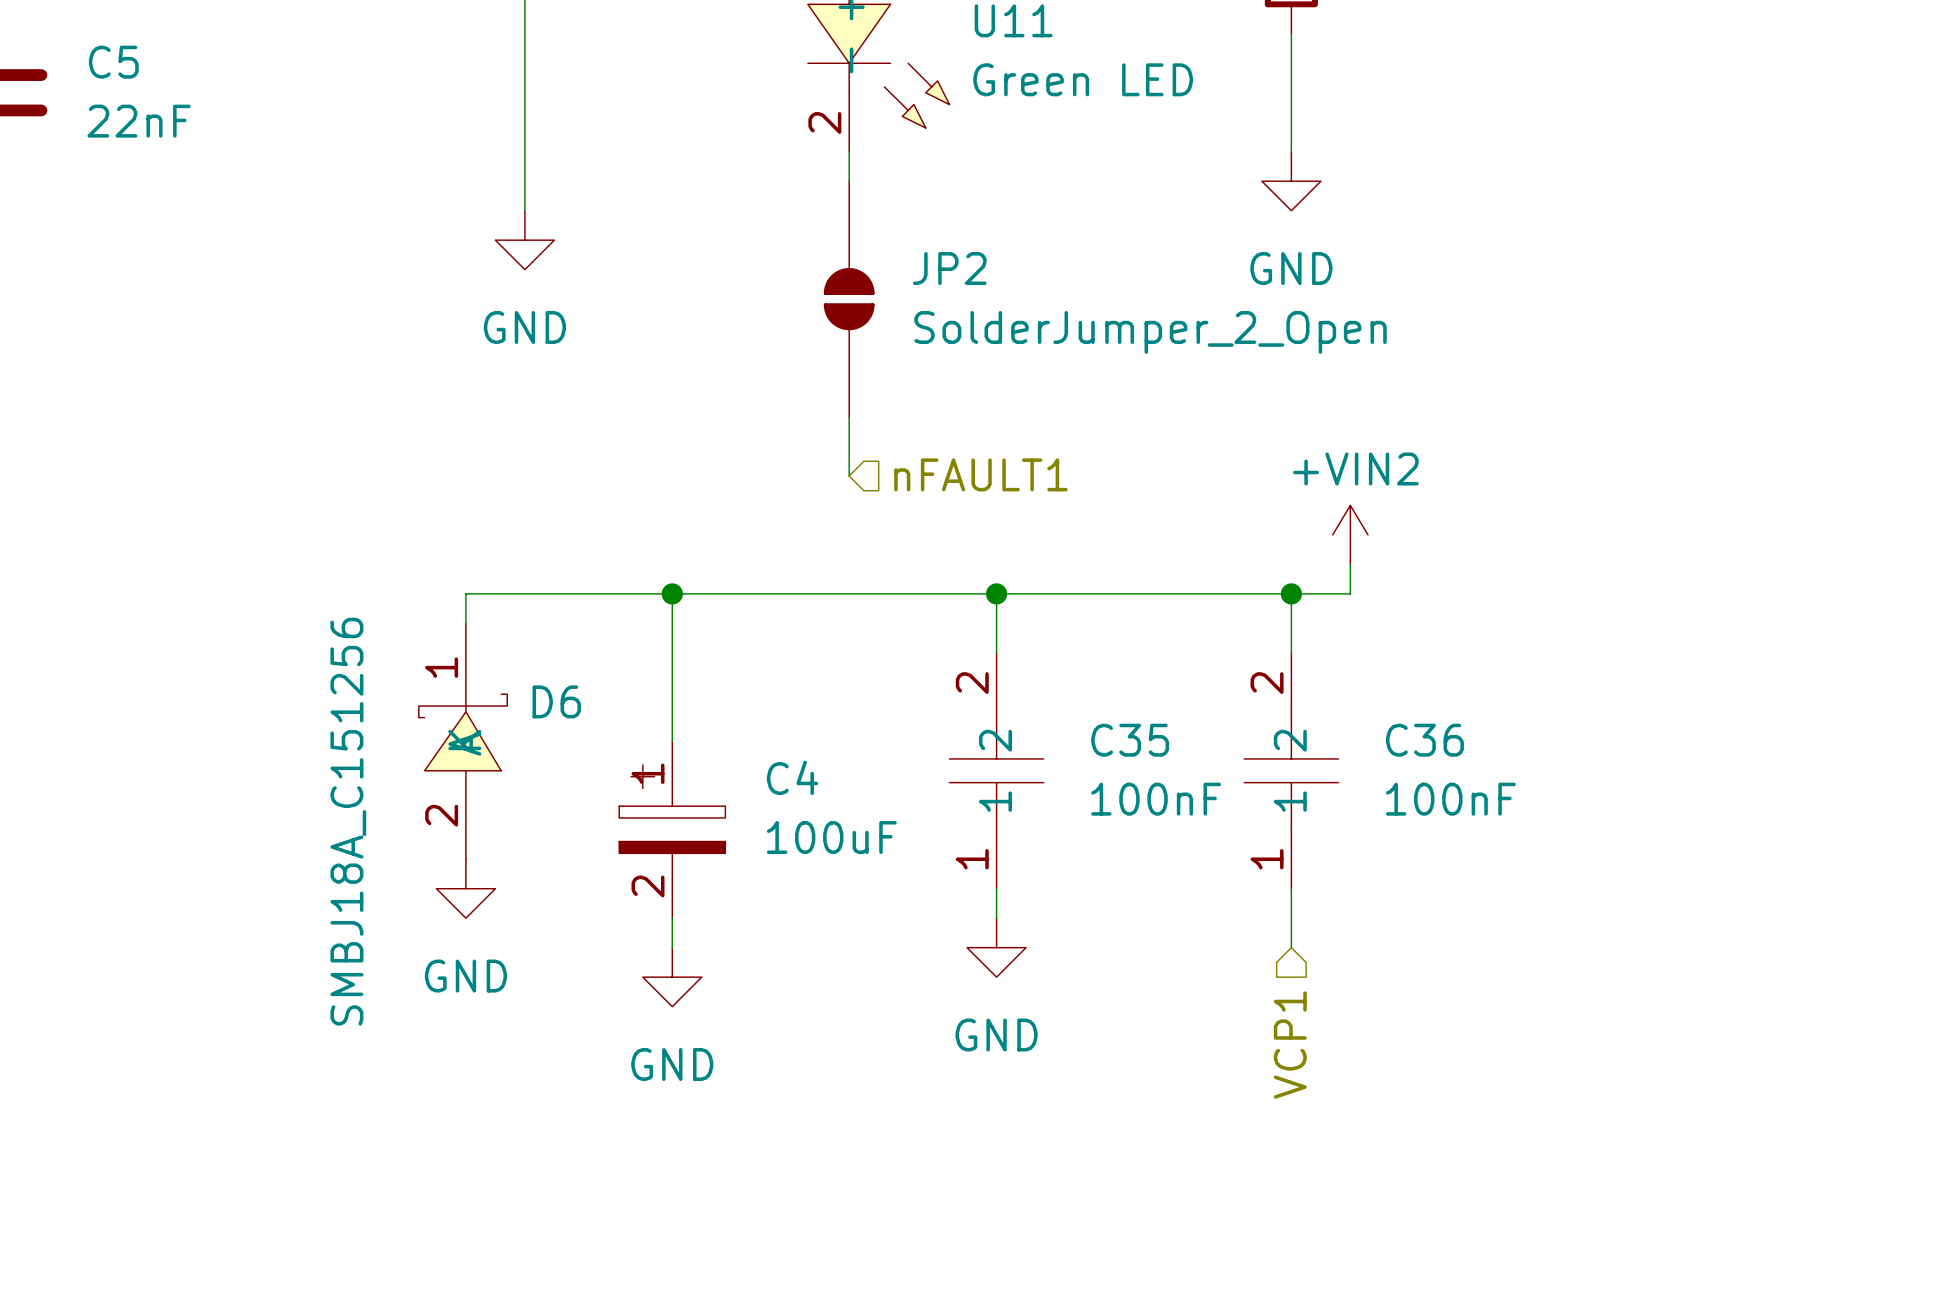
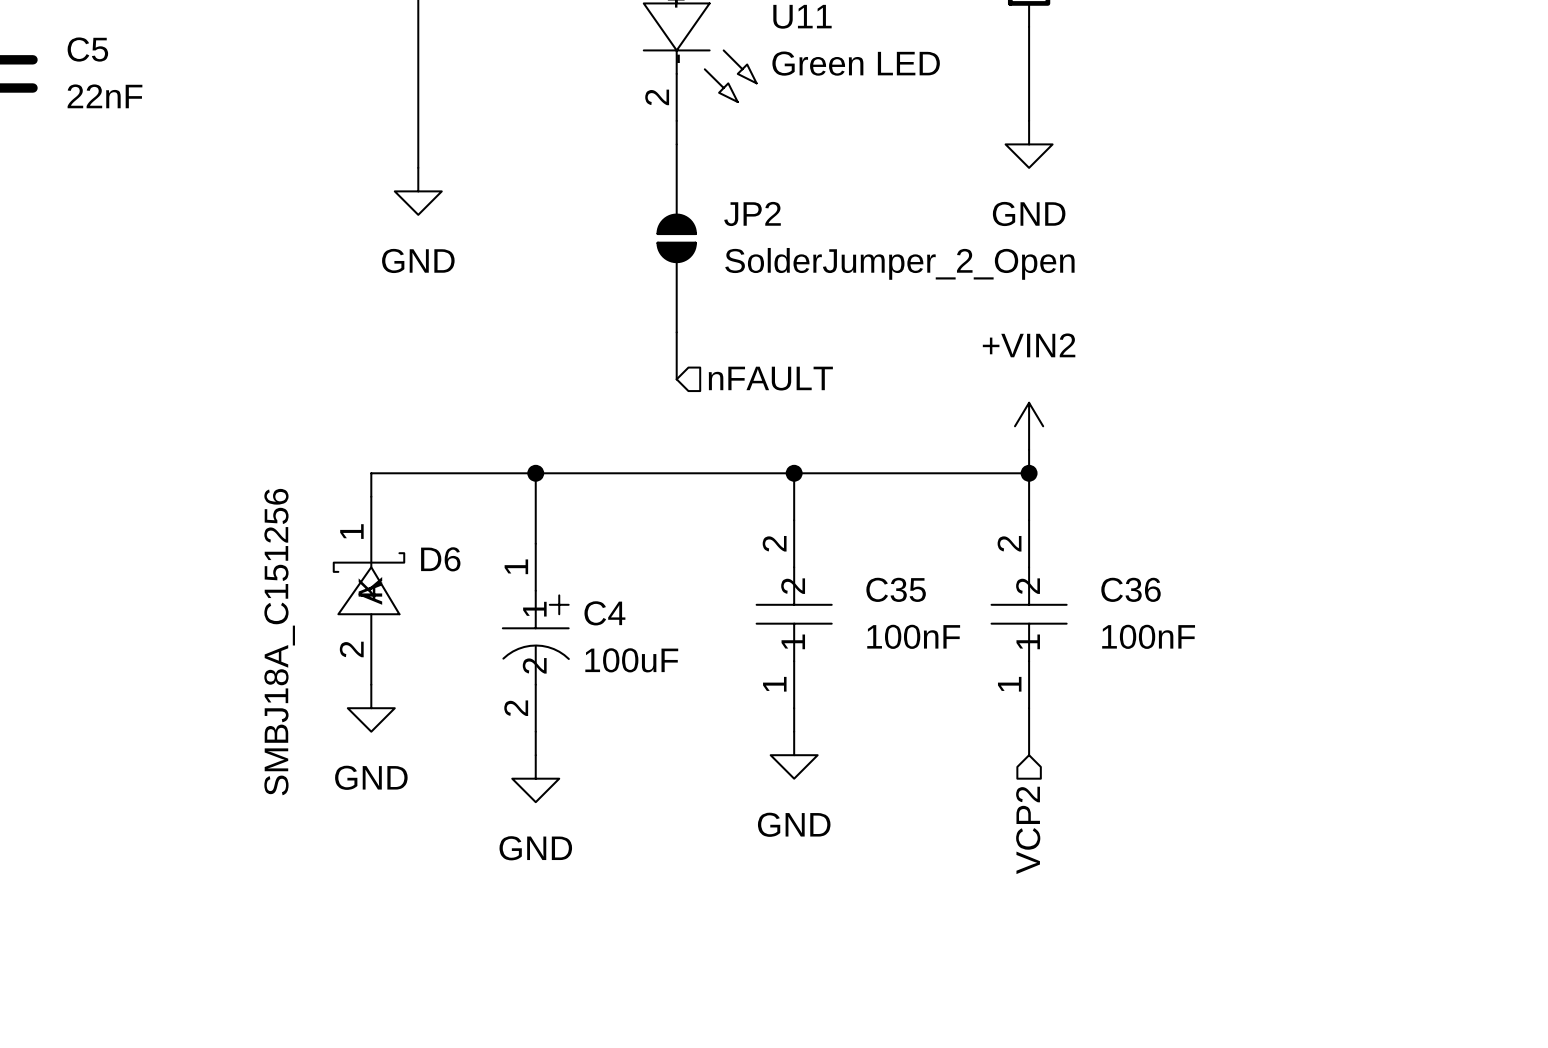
power symbol text position: +VIN2 (1355, 469) -> +VIN2 (1029, 345)
hierarchical label: nFAULT1 (980, 474) -> nFAULT (770, 378)
power symbol position: +VIN2 (1350, 534) -> +VIN2 (1029, 426)
wire: (1350, 564) (1350, 593) (1291, 593) -> (1029, 449) (1029, 473)
C4 symbol: [619, 741, 726, 919] -> [502, 543, 569, 732]
hierarchical label: VCP1 (1290, 1045) -> VCP2 (1028, 830)

